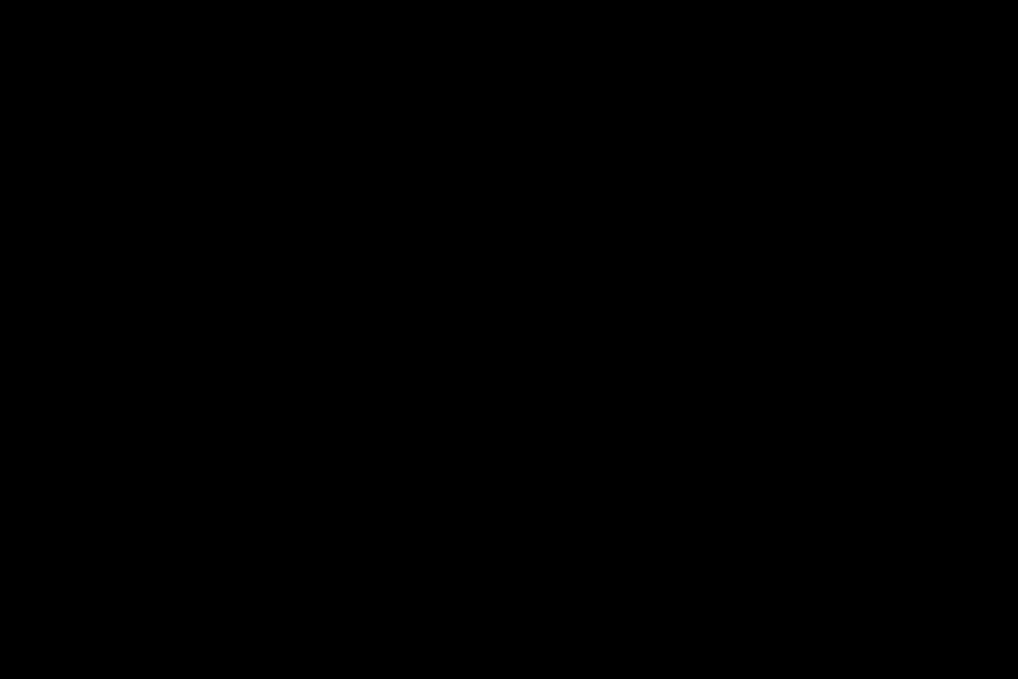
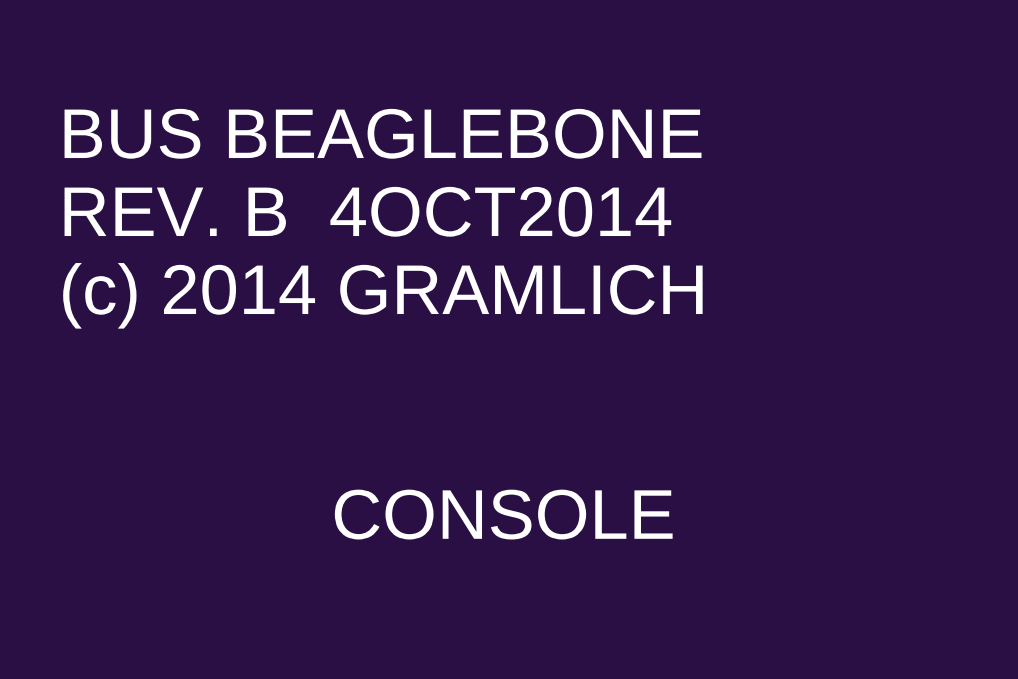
text: none -> BUS BEAGLEBONE (383, 133)
text: none -> REV. B 4OCT2014 (367, 211)
text: none -> (c) 2014 GRAMLICH (382, 295)
text: none -> CONSOLE (503, 514)

